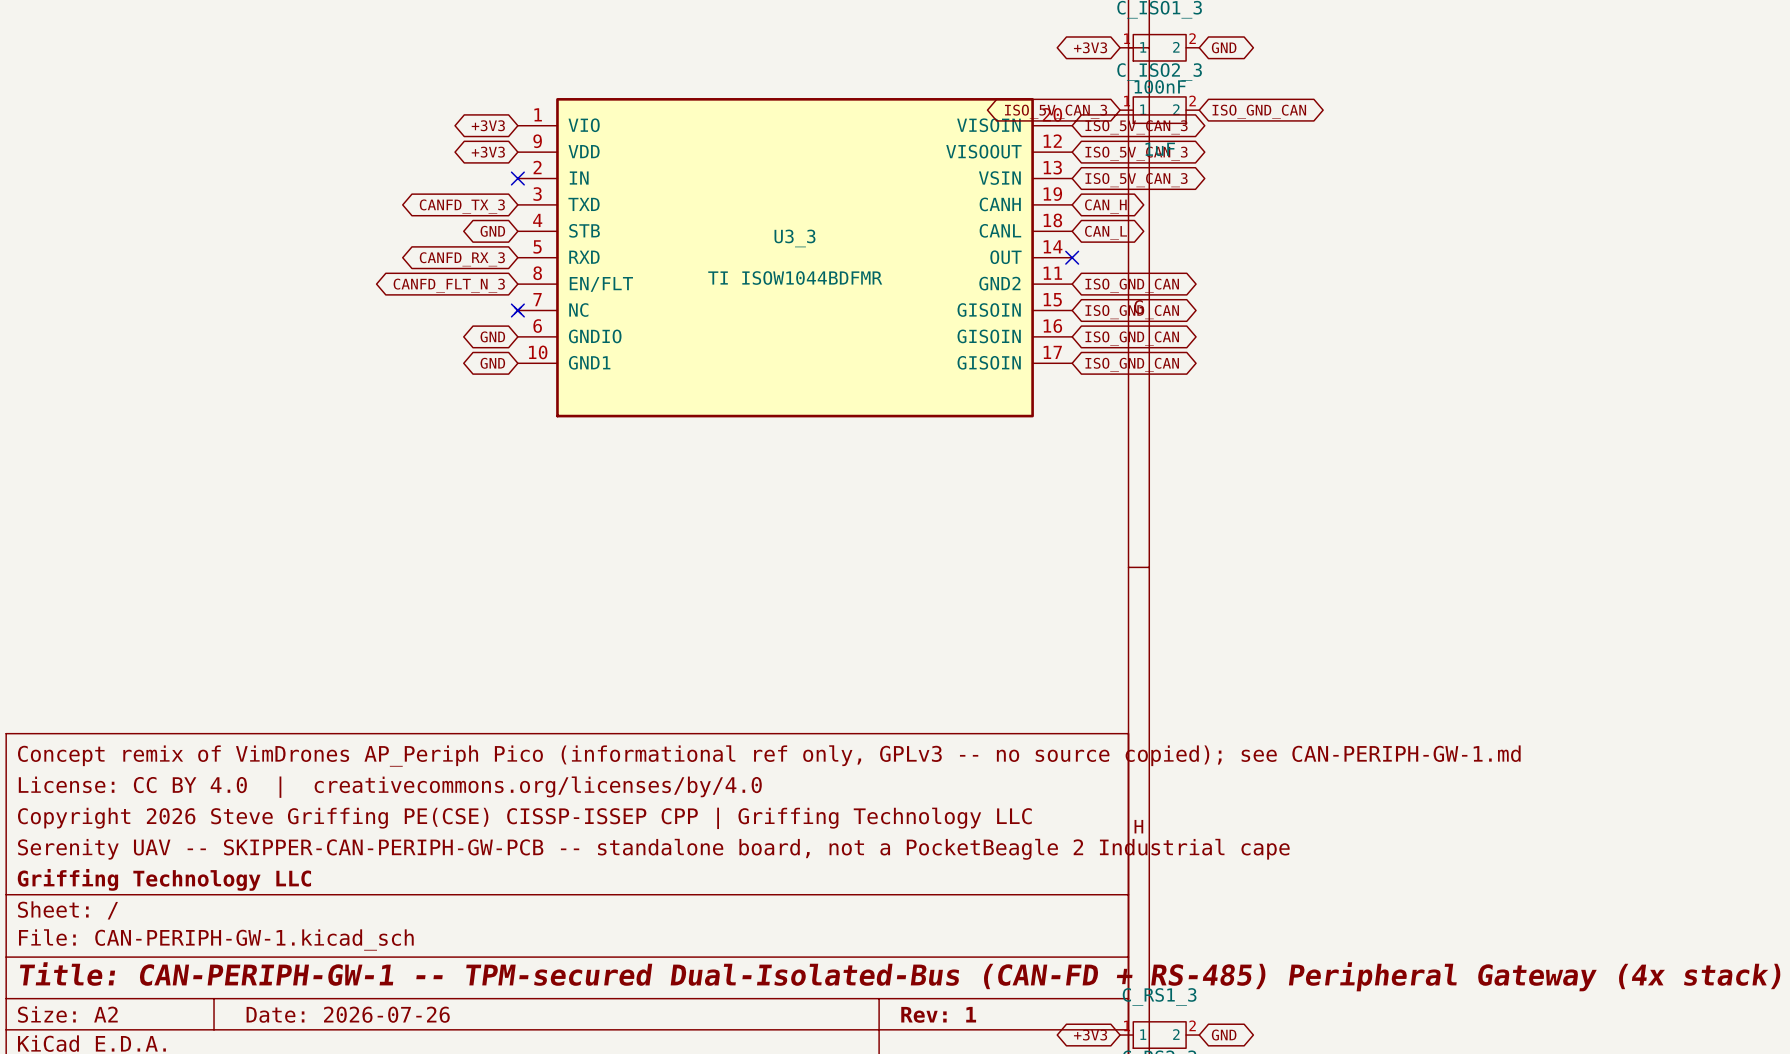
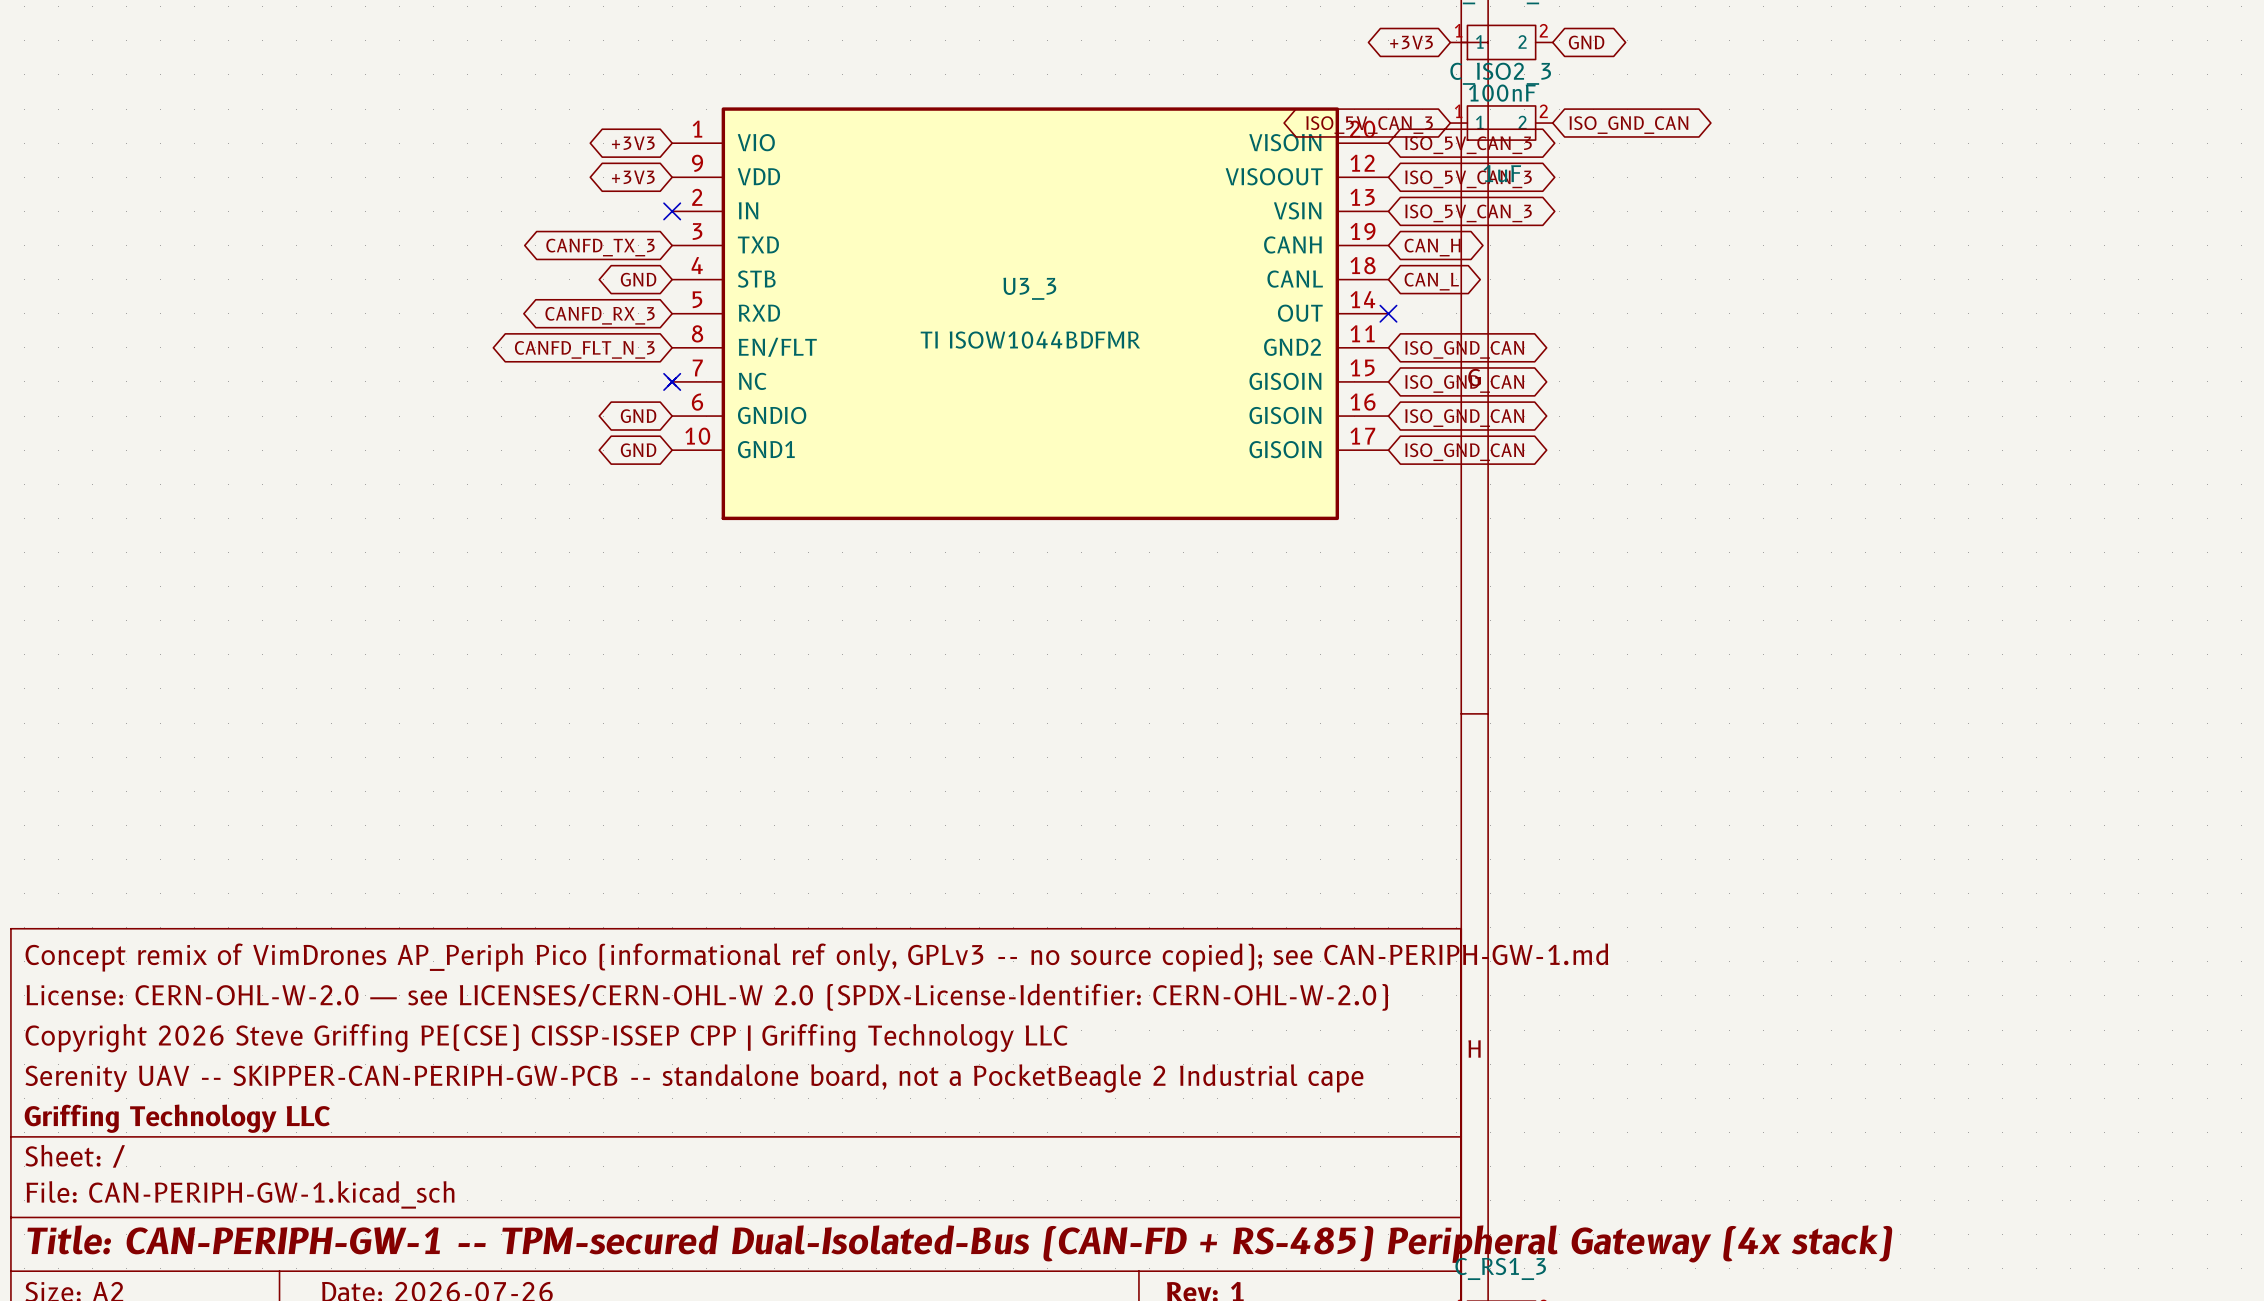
title block: License: CC BY 4.0 | creativecommons.org/licenses/by/4.0 (390, 787) -> License: CERN-OHL-W-2.0 — see LICENSES/CERN-OHL-W 2.0 (SPDX-License-Identifier: CERN-OHL-W-2.0) (707, 997)

